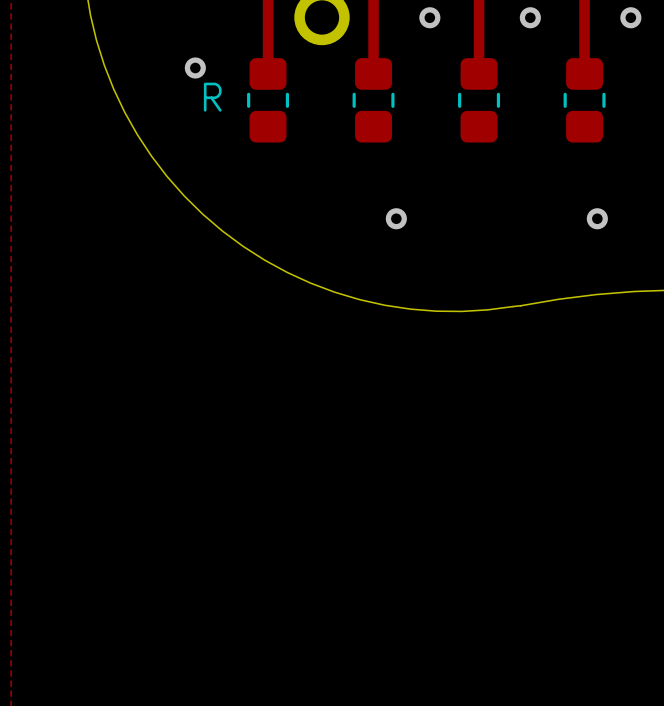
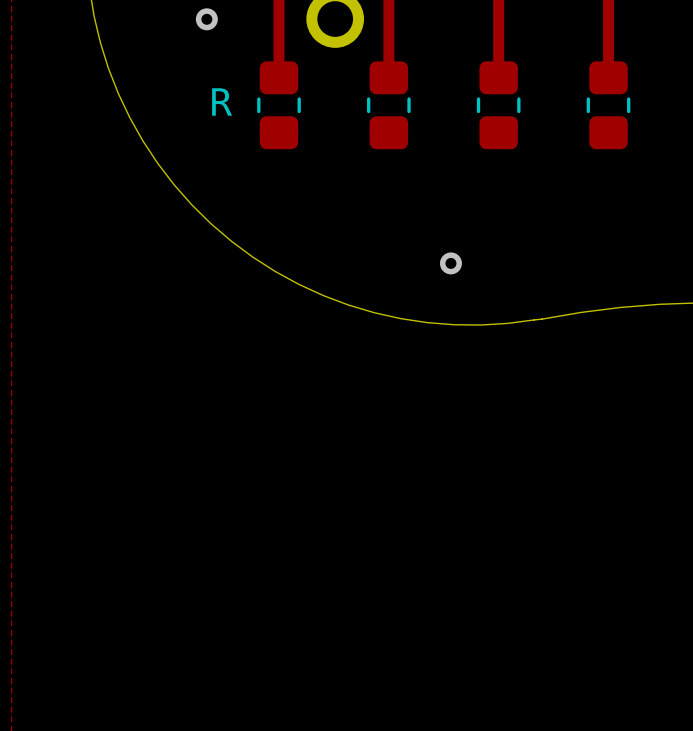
via: (429, 17) -> none
via: (530, 17) -> none
via: (630, 17) -> none
via position: (195, 68) -> (206, 19)
via position: (396, 218) -> (450, 263)
via: (597, 218) -> none

